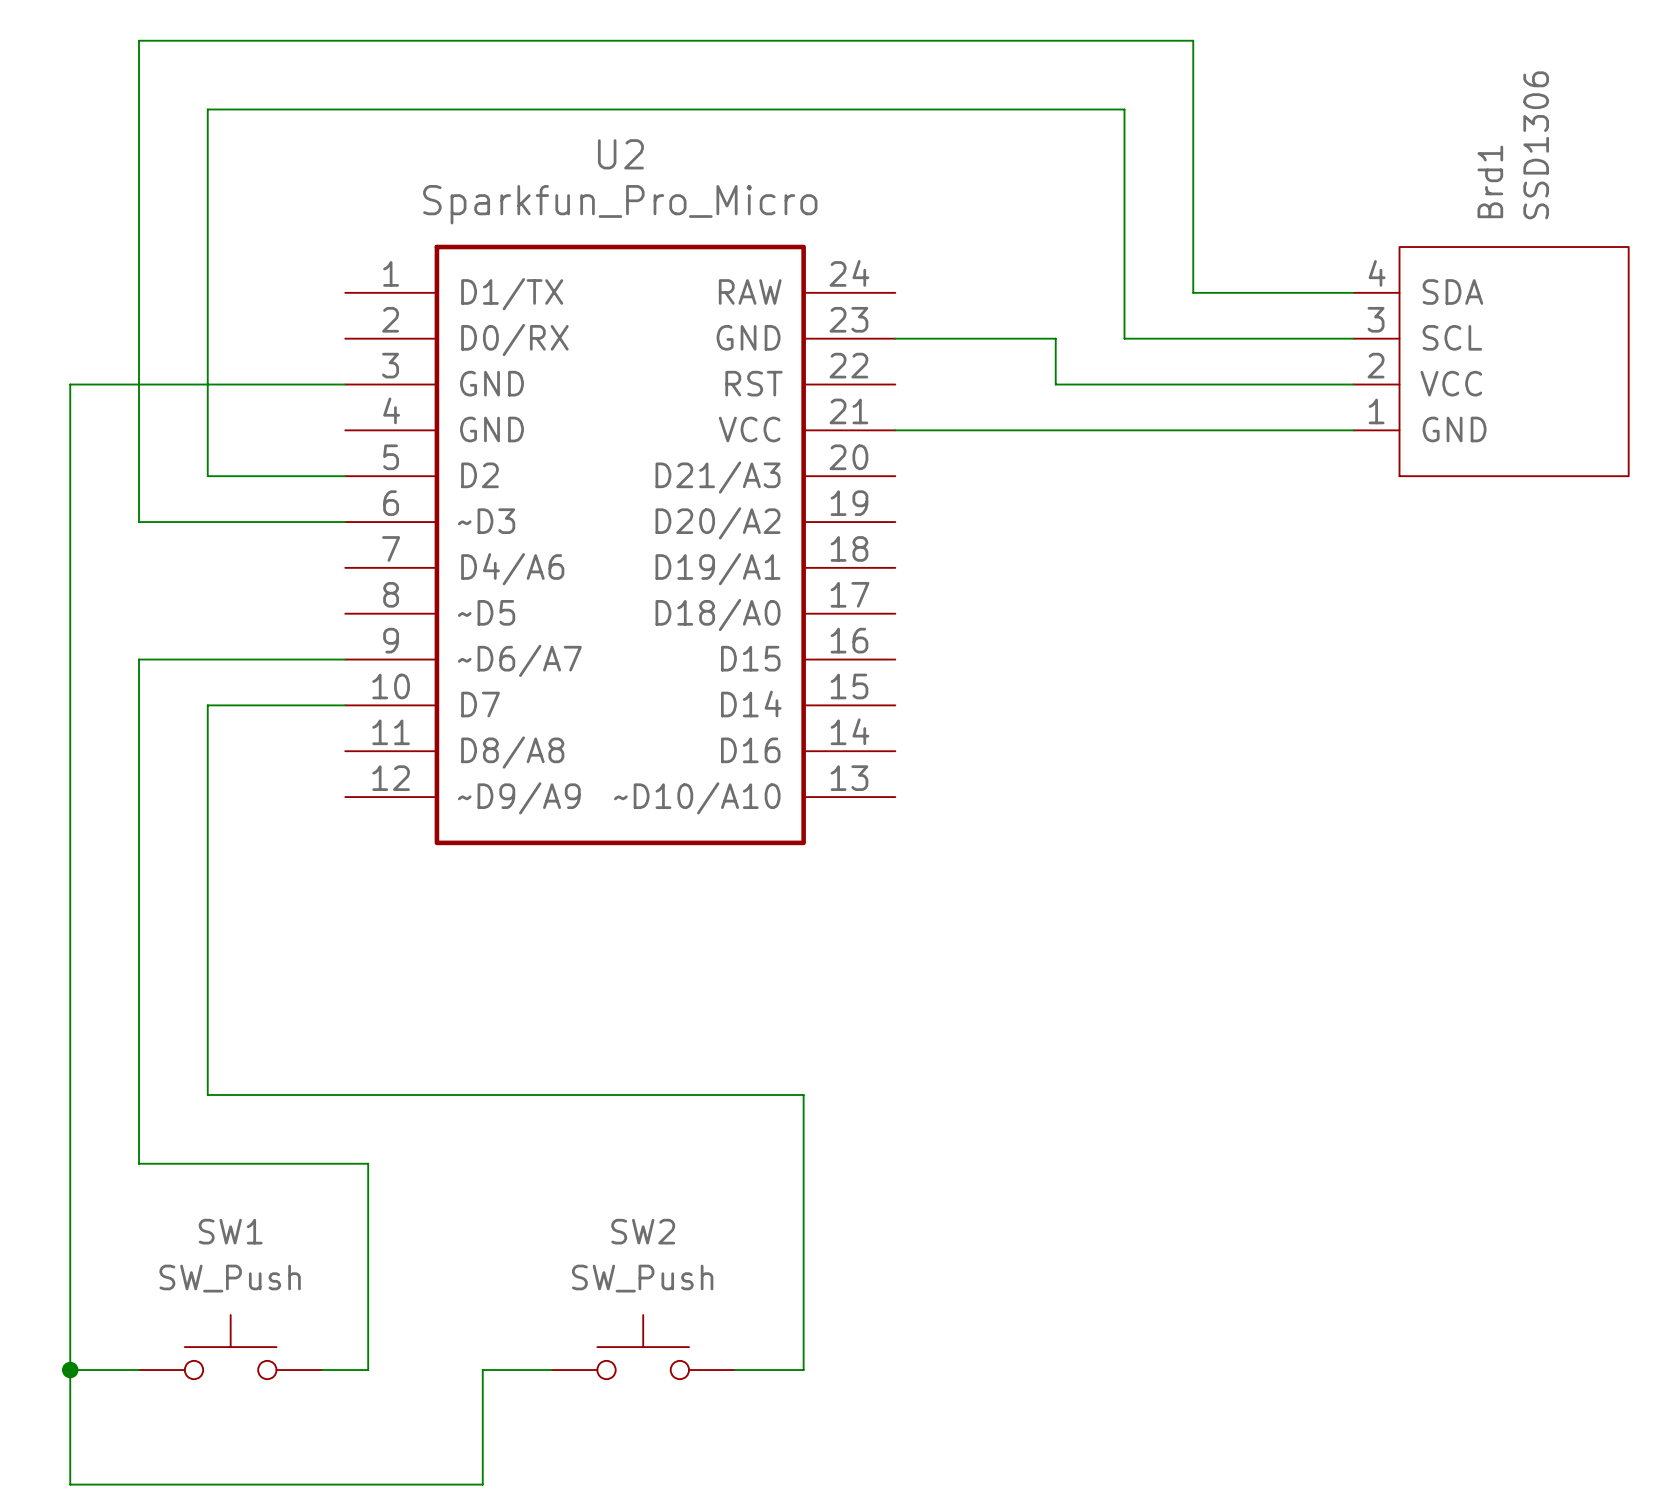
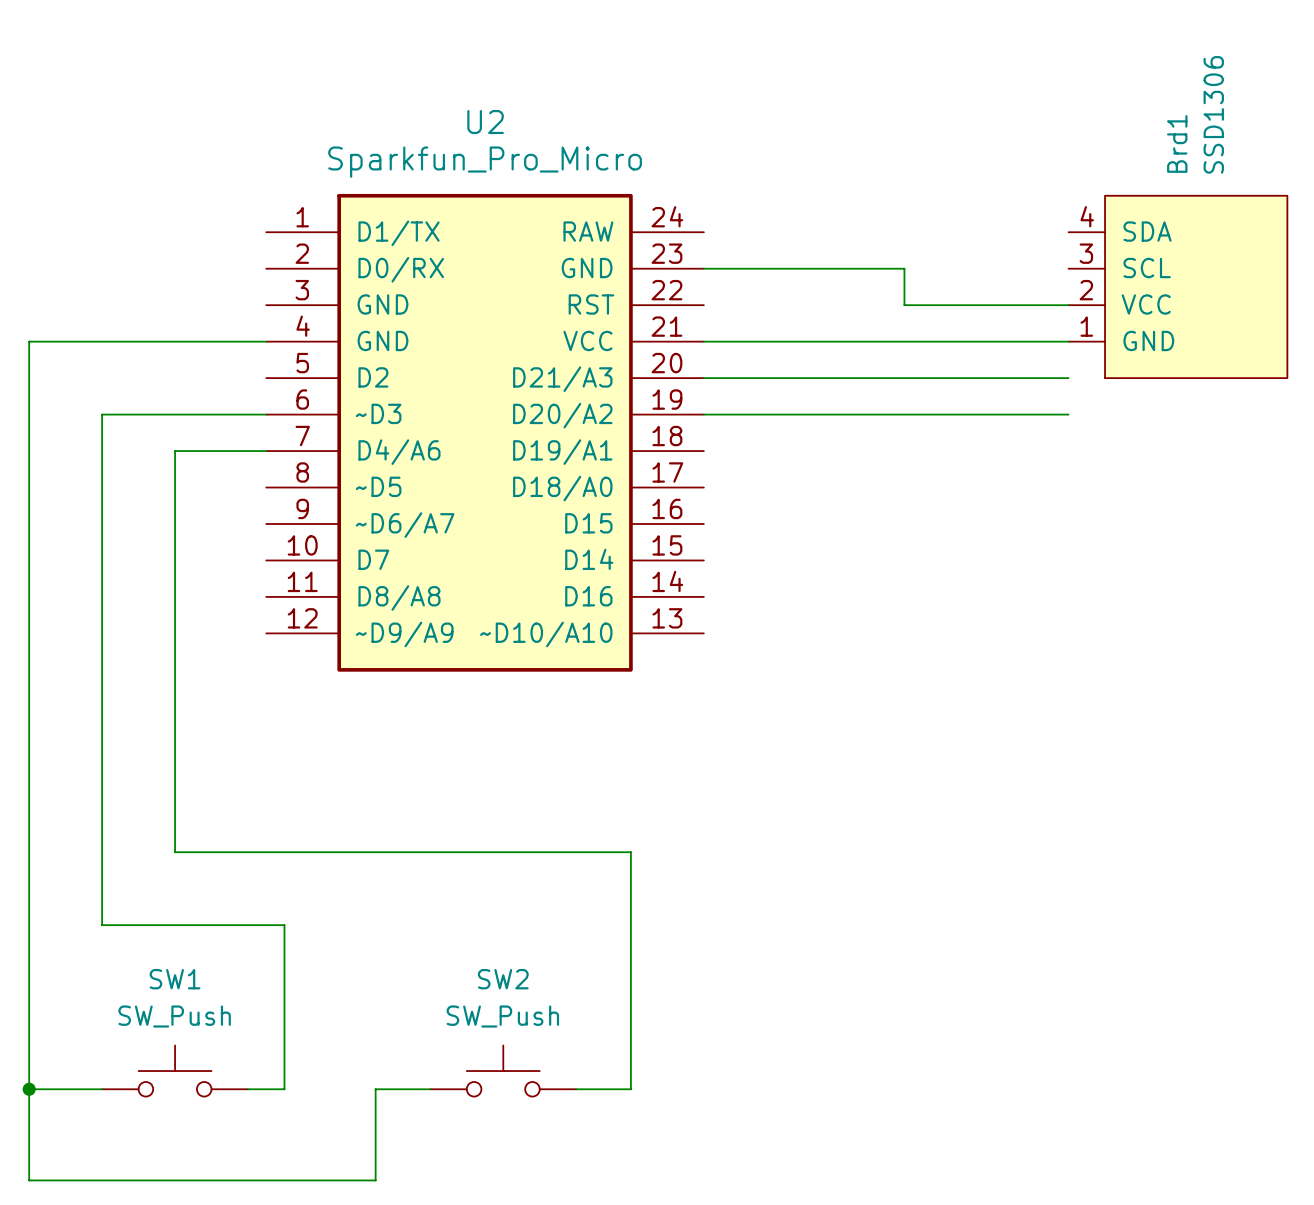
wire: (1353, 292) (1193, 292) (1193, 40) (138, 40) (138, 522) -> none
wire: (1055, 338) (1055, 384) (1147, 384) -> (831, 268) (886, 268)
wire: (1124, 338) (1124, 109) (207, 109) (207, 476) (345, 476) -> none
wire: (1147, 338) (1353, 338) -> (904, 268) (904, 305)
wire: (345, 384) (70, 384) (70, 1484) -> (266, 341) (29, 341) (29, 1180) (47, 1180)
wire: none -> (703, 378) (1068, 378)
wire: none -> (703, 414) (1068, 414)
wire: (138, 659) (345, 659) -> (102, 523) (102, 414)
wire: (345, 705) (207, 705) (207, 1094) (803, 1094) -> (266, 451) (175, 451) (175, 852) (630, 852) (630, 870)
wire: none -> (29, 1089) (47, 1089)
junction position: (70, 1370) -> (29, 1089)

